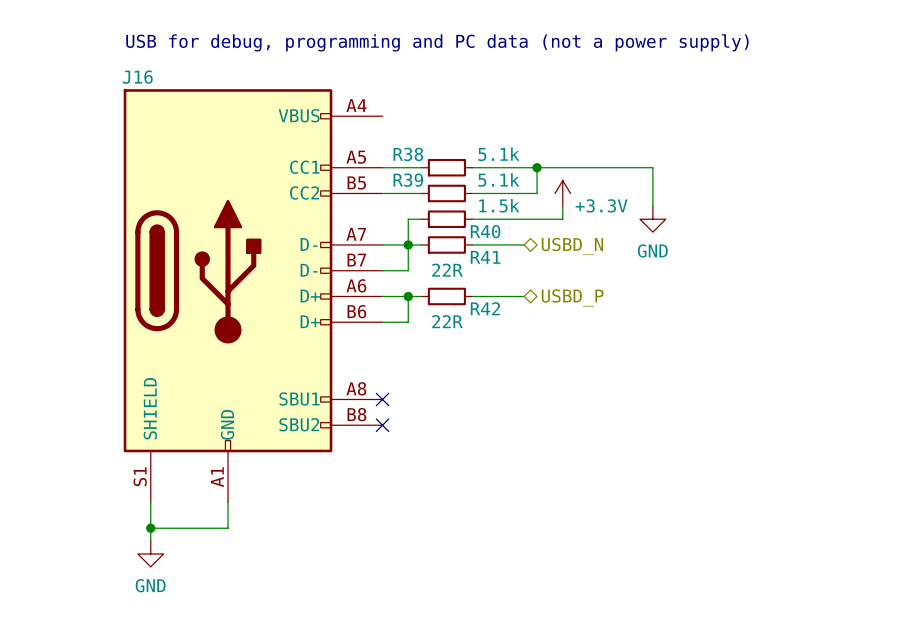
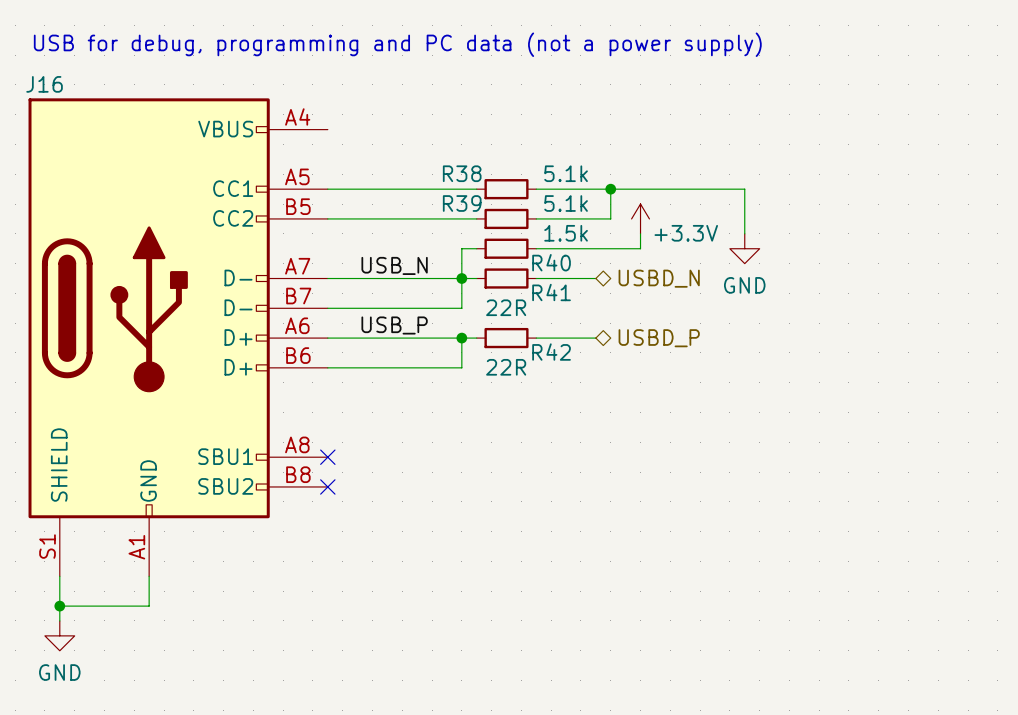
text position: USB for debug, programming and PC data (not a power supply) (437, 42) -> USB for debug, programming and PC data (not a power supply) (397, 44)
label: none -> USB_N (394, 265)
label: none -> USB_P (394, 325)
J16 position: (253, 295) -> (178, 337)
no-connect mark: none -> (327, 457)
no-connect mark: (382, 399) -> none
no-connect mark: none -> (327, 486)
no-connect mark: (382, 425) -> none
wire: (150, 502) (150, 541) -> (59, 576) (59, 620)
wire: (228, 502) (228, 528) (150, 528) -> (149, 576) (149, 606) (59, 606)
junction: none -> (59, 606)
junction: (150, 528) -> none
power symbol position: GND (150, 553) -> GND (59, 635)

